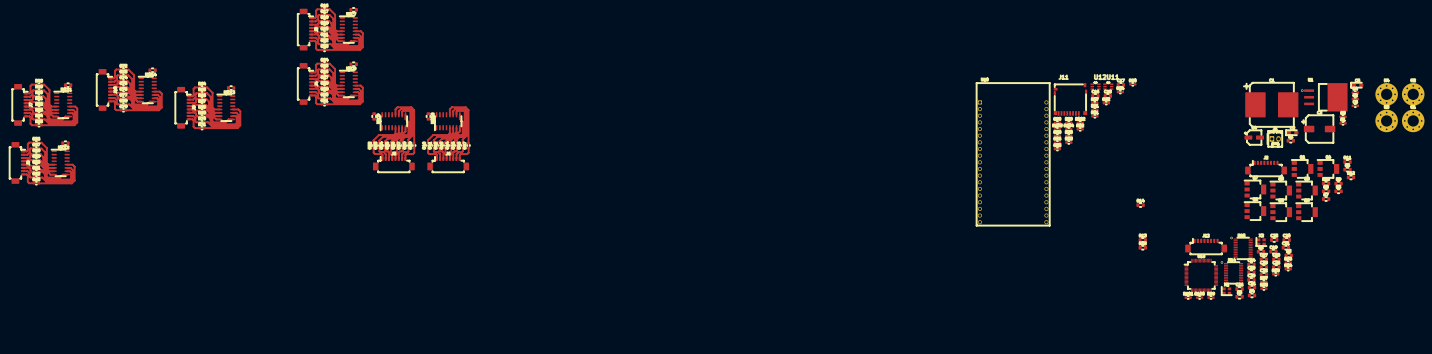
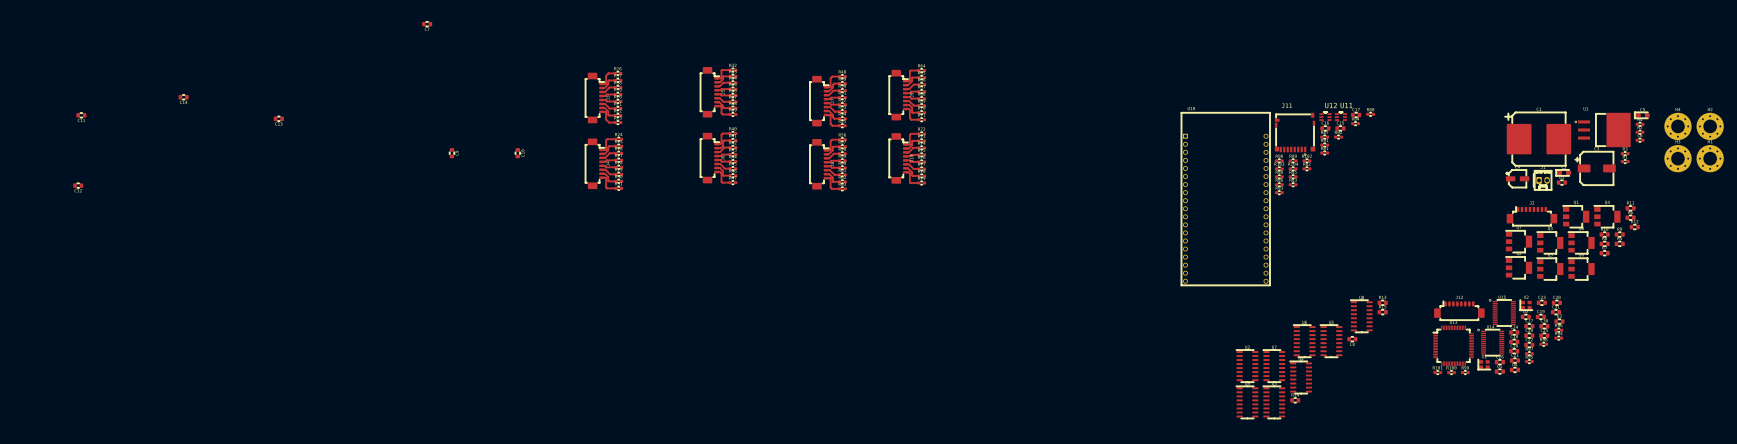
top track: (322, 9) (317, 9) (316, 17) (311, 18) -> none
part position: (324, 9) -> (617, 73)
top track: (326, 9) (329, 9) (335, 14) (335, 29) (342, 31) -> none
top track: (322, 15) (318, 15) (315, 21) (311, 21) -> none
part position: (324, 15) -> (617, 80)
top track: (326, 15) (333, 18) (333, 30) (337, 34) (342, 34) -> none
top track: (322, 20) (319, 20) (317, 24) (311, 24) -> none
part position: (324, 20) -> (617, 87)
top track: (326, 20) (331, 23) (331, 31) (337, 37) (342, 37) -> none
top track: (322, 26) (311, 27) -> none
part position: (324, 26) -> (617, 94)
top track: (326, 26) (338, 41) (342, 41) -> none
part position: (305, 29) -> (594, 97)
part position: (348, 29) -> (1247, 366)
top track: (311, 31) (322, 32) -> none
top track: (355, 31) (362, 33) (362, 47) (360, 49) (326, 49) -> none
part position: (324, 32) -> (617, 101)
top track: (326, 32) (334, 40) (335, 44) (348, 44) (351, 41) (355, 41) -> none
top track: (311, 34) (317, 34) (319, 38) (322, 38) -> none
top track: (355, 34) (361, 36) (359, 47) (334, 47) (330, 44) (326, 44) -> none
top track: (311, 37) (315, 37) (318, 44) (322, 44) -> none
top track: (355, 37) (359, 38) (358, 46) (335, 46) (330, 38) (326, 38) -> none
part position: (324, 38) -> (617, 108)
top track: (311, 41) (316, 42) (317, 49) (322, 49) -> none
part position: (324, 44) -> (617, 115)
top track: none -> (730, 70) (722, 70) (721, 77) (716, 78)
top track: none -> (918, 70) (910, 70) (909, 80) (905, 81)
part position: (324, 49) -> (617, 122)
top track: none -> (615, 73) (608, 73) (606, 75) (606, 83) (601, 84)
top track: none -> (730, 76) (723, 76) (719, 82) (716, 82)
top track: none -> (839, 76) (832, 76) (830, 86) (826, 87)
top track: none -> (918, 77) (912, 77) (912, 81) (905, 85)
top track: none -> (615, 80) (609, 80) (608, 84) (601, 88)
top track: none -> (730, 82) (723, 82) (716, 86)
top track: none -> (839, 83) (834, 83) (829, 91) (826, 91)
top track: none -> (918, 84) (913, 84) (909, 89) (905, 89)
top track: none -> (615, 87) (609, 87) (605, 92) (601, 92)
top track: (322, 63) (317, 63) (316, 71) (311, 72) -> none
part position: (324, 63) -> (618, 139)
top track: (326, 63) (329, 63) (335, 69) (335, 84) (342, 85) -> none
top track: none -> (730, 89) (716, 90)
part position: (353, 64) -> (1352, 339)
top track: none -> (839, 90) (833, 90) (826, 95)
top track: none -> (918, 91) (905, 93)
top track: none -> (615, 94) (601, 96)
top track: none -> (716, 94) (730, 95)
top track: (121, 69) (116, 69) (114, 77) (110, 78) -> none
part position: (123, 69) -> (921, 133)
top track: (125, 69) (128, 69) (133, 75) (133, 90) (141, 91) -> none
top track: (322, 69) (318, 69) (315, 75) (311, 75) -> none
part position: (324, 69) -> (618, 146)
top track: (326, 69) (333, 73) (333, 84) (337, 88) (342, 88) -> none
top track: none -> (839, 97) (826, 99)
top track: none -> (905, 97) (918, 98)
top track: none -> (716, 98) (723, 101) (730, 101)
top track: none -> (601, 99) (615, 101)
top track: none -> (905, 101) (909, 101) (913, 105) (918, 105)
top track: none -> (716, 102) (719, 102) (723, 108) (730, 108)
top track: (121, 75) (117, 75) (114, 81) (110, 81) -> none
part position: (123, 75) -> (921, 140)
top track: (125, 75) (132, 79) (132, 90) (136, 94) (141, 94) -> none
top track: (322, 75) (319, 75) (317, 79) (311, 79) -> none
part position: (324, 75) -> (618, 153)
top track: (326, 75) (331, 77) (331, 85) (337, 92) (342, 92) -> none
top track: none -> (601, 103) (605, 103) (609, 108) (615, 108)
top track: none -> (826, 103) (839, 104)
top track: none -> (905, 105) (912, 107) (912, 112) (918, 112)
top track: none -> (716, 106) (721, 106) (722, 114) (730, 114)
top track: none -> (826, 107) (830, 107) (834, 111) (839, 111)
top track: none -> (601, 107) (608, 111) (609, 115) (615, 115)
top track: none -> (905, 109) (909, 110) (911, 119) (918, 119)
top track: (121, 81) (118, 81) (116, 84) (110, 84) -> none
part position: (123, 81) -> (921, 147)
top track: (125, 81) (130, 83) (130, 91) (136, 98) (141, 98) -> none
top track: (322, 81) (311, 82) -> none
part position: (324, 81) -> (618, 160)
top track: (326, 81) (338, 95) (342, 95) -> none
top track: none -> (826, 111) (829, 111) (834, 118) (839, 118)
top track: none -> (601, 111) (606, 112) (606, 119) (609, 122) (615, 122)
part position: (305, 83) -> (594, 163)
part position: (348, 83) -> (1274, 402)
top track: (36, 84) (31, 84) (30, 92) (25, 93) -> none
part position: (39, 84) -> (842, 76)
top track: (41, 84) (44, 84) (49, 89) (49, 105) (56, 106) -> none
top track: none -> (826, 115) (830, 115) (832, 125) (839, 125)
top track: (311, 85) (322, 86) -> none
top track: (355, 85) (362, 87) (362, 101) (360, 104) (326, 104) -> none
top track: (121, 86) (110, 88) -> none
part position: (324, 86) -> (618, 167)
top track: (326, 86) (334, 94) (335, 98) (348, 98) (351, 95) (355, 95) -> none
part position: (123, 87) -> (921, 154)
top track: (125, 87) (137, 101) (141, 101) -> none
top track: (199, 87) (194, 87) (193, 95) (188, 96) -> none
part position: (202, 87) -> (921, 70)
top track: (204, 87) (207, 87) (212, 92) (212, 107) (219, 109) -> none
top track: (311, 88) (317, 88) (319, 92) (322, 92) -> none
top track: (355, 88) (360, 91) (359, 102) (334, 102) (330, 98) (326, 98) -> none
part position: (104, 89) -> (898, 158)
part position: (147, 89) -> (1247, 402)
top track: (36, 90) (33, 90) (30, 96) (25, 96) -> none
part position: (39, 90) -> (842, 83)
top track: (41, 90) (47, 94) (47, 105) (51, 109) (56, 109) -> none
top track: (110, 91) (121, 92) -> none
top track: (154, 91) (161, 93) (161, 107) (158, 110) (125, 110) -> none
part position: (123, 92) -> (921, 161)
top track: (125, 92) (133, 100) (134, 104) (147, 104) (149, 101) (154, 101) -> none
top track: (311, 92) (315, 92) (318, 98) (322, 98) -> none
part position: (324, 92) -> (618, 174)
top track: (355, 92) (359, 93) (358, 100) (335, 100) (330, 92) (326, 92) -> none
top track: (199, 93) (196, 93) (193, 99) (188, 99) -> none
part position: (202, 93) -> (921, 77)
top track: (204, 93) (210, 96) (210, 108) (214, 112) (219, 112) -> none
top track: (110, 94) (116, 94) (118, 98) (121, 98) -> none
top track: (154, 94) (159, 97) (158, 108) (133, 108) (129, 104) (125, 104) -> none
top track: (311, 95) (316, 96) (317, 104) (322, 104) -> none
top track: (36, 96) (33, 96) (32, 99) (25, 99) -> none
part position: (39, 96) -> (842, 90)
top track: (41, 96) (45, 98) (45, 106) (52, 113) (56, 113) -> none
top track: (110, 98) (114, 98) (117, 104) (121, 104) -> none
part position: (123, 98) -> (921, 168)
top track: (154, 98) (158, 99) (157, 106) (133, 106) (129, 98) (125, 98) -> none
part position: (324, 98) -> (618, 181)
top track: (199, 99) (197, 99) (195, 102) (188, 102) -> none
part position: (202, 99) -> (921, 84)
top track: (204, 99) (208, 101) (208, 109) (215, 116) (219, 116) -> none
top track: none -> (730, 133) (722, 133) (721, 143) (716, 144)
top track: none -> (918, 133) (910, 133) (909, 144) (905, 144)
top track: (110, 101) (114, 102) (116, 110) (121, 110) -> none
top track: (36, 102) (25, 103) -> none
part position: (39, 102) -> (842, 97)
top track: (41, 102) (53, 116) (56, 116) -> none
part position: (20, 104) -> (819, 101)
part position: (63, 104) -> (1304, 341)
part position: (123, 104) -> (921, 175)
top track: (199, 104) (188, 106) -> none
part position: (202, 104) -> (921, 91)
top track: (204, 104) (216, 119) (219, 119) -> none
part position: (324, 104) -> (618, 188)
top track: none -> (615, 139) (607, 139) (606, 149) (601, 149)
top track: none -> (730, 140) (723, 140) (722, 146) (716, 148)
top track: none -> (839, 139) (832, 139) (830, 149) (826, 150)
top track: (25, 106) (36, 107) -> none
top track: (69, 106) (77, 108) (77, 122) (74, 125) (41, 125) -> none
top track: none -> (918, 140) (912, 140) (912, 145) (905, 148)
part position: (39, 107) -> (842, 104)
top track: (41, 107) (49, 115) (50, 119) (62, 119) (65, 116) (69, 116) -> none
part position: (183, 107) -> (898, 95)
part position: (226, 107) -> (1361, 316)
top track: (25, 109) (32, 109) (33, 113) (36, 113) -> none
top track: (69, 109) (75, 111) (73, 123) (48, 123) (44, 119) (41, 119) -> none
top track: (188, 109) (199, 110) -> none
top track: (232, 109) (240, 111) (240, 125) (237, 128) (204, 128) -> none
part position: (123, 110) -> (921, 183)
part position: (202, 110) -> (921, 98)
top track: (204, 110) (212, 118) (213, 122) (225, 122) (228, 119) (232, 119) -> none
top track: none -> (615, 146) (609, 146) (608, 150) (601, 153)
top track: none -> (730, 147) (724, 147) (719, 152) (716, 152)
top track: none -> (839, 146) (833, 146) (832, 150) (826, 154)
top track: (188, 112) (195, 112) (197, 116) (199, 116) -> none
top track: (232, 112) (238, 114) (236, 126) (211, 126) (207, 122) (204, 122) -> none
top track: none -> (918, 147) (913, 147) (908, 152) (905, 152)
top track: (25, 113) (30, 113) (33, 119) (36, 119) -> none
part position: (39, 113) -> (842, 111)
top track: (69, 113) (73, 114) (73, 121) (49, 121) (44, 113) (41, 113) -> none
top track: (395, 114) (397, 107) (411, 107) (414, 110) (414, 143) -> none
top track: (398, 114) (400, 109) (412, 110) (412, 135) (408, 139) (408, 143) -> none
top track: (402, 114) (403, 110) (410, 111) (410, 135) (402, 139) (402, 143) -> none
top track: (405, 114) (405, 119) (408, 121) (408, 134) (404, 135) (396, 143) -> none
top track: (449, 114) (451, 107) (465, 107) (468, 110) (468, 143) -> none
top track: (453, 114) (455, 109) (466, 110) (466, 135) (462, 139) (462, 143) -> none
top track: (456, 114) (457, 110) (464, 111) (464, 135) (456, 139) (456, 143) -> none
top track: (459, 114) (459, 119) (462, 121) (462, 134) (458, 135) (451, 143) -> none
top track: (188, 115) (193, 115) (196, 122) (199, 122) -> none
top track: (25, 116) (30, 117) (31, 125) (36, 125) -> none
part position: (202, 116) -> (921, 105)
top track: (232, 116) (236, 116) (236, 124) (212, 124) (208, 116) (204, 116) -> none
top track: none -> (615, 153) (609, 153) (605, 157) (601, 157)
top track: none -> (839, 153) (833, 153) (829, 158) (826, 158)
top track: none -> (730, 154) (716, 156)
top track: none -> (918, 154) (905, 156)
part position: (39, 119) -> (842, 118)
top track: (188, 119) (193, 120) (194, 128) (199, 128) -> none
part rotation: 0° (393, 121) -> 90° clockwise (1301, 377)
part position: (393, 121) -> (1301, 377)
part rotation: 0° (448, 121) -> 90° clockwise (1331, 341)
part position: (448, 121) -> (1331, 341)
part position: (202, 122) -> (921, 112)
top track: none -> (615, 160) (601, 161)
top track: none -> (716, 160) (730, 161)
top track: none -> (839, 160) (826, 162)
top track: none -> (905, 160) (918, 161)
part position: (39, 125) -> (842, 125)
top track: none -> (716, 164) (720, 164) (724, 168) (730, 168)
top track: none -> (905, 164) (909, 164) (913, 168) (918, 168)
top track: none -> (601, 165) (615, 167)
top track: (395, 127) (393, 135) (378, 135) (373, 140) (373, 143) -> none
top track: (398, 127) (398, 132) (394, 136) (382, 136) (379, 143) -> none
top track: (402, 127) (402, 132) (395, 138) (387, 138) (385, 143) -> none
top track: (405, 127) (405, 131) (390, 143) -> none
top track: (449, 127) (448, 135) (433, 135) (427, 140) (427, 143) -> none
top track: (453, 127) (453, 132) (449, 136) (437, 136) (433, 143) -> none
top track: (456, 127) (456, 132) (449, 138) (442, 138) (439, 143) -> none
top track: (459, 127) (459, 131) (445, 143) -> none
top track: none -> (826, 166) (839, 167)
part position: (202, 128) -> (921, 119)
top track: none -> (716, 168) (722, 171) (723, 175) (730, 175)
top track: none -> (905, 168) (912, 172) (913, 175) (918, 175)
top track: none -> (601, 169) (605, 169) (610, 174) (615, 174)
top track: none -> (826, 170) (829, 170) (834, 174) (839, 174)
top track: none -> (716, 171) (721, 173) (722, 182) (730, 182)
top track: none -> (905, 172) (909, 173) (910, 183) (918, 183)
top track: none -> (601, 173) (608, 177) (608, 181) (615, 181)
top track: none -> (826, 174) (832, 177) (833, 181) (839, 181)
top track: none -> (601, 177) (606, 177) (606, 188) (615, 188)
top track: none -> (826, 178) (830, 178) (832, 188) (839, 188)
top track: (34, 142) (29, 142) (27, 150) (22, 151) -> none
part position: (36, 142) -> (842, 139)
top track: (38, 142) (41, 142) (46, 148) (46, 163) (54, 164) -> none
part rotation: 0° (373, 145) -> 90° clockwise (732, 70)
part position: (373, 145) -> (732, 70)
part rotation: 0° (379, 145) -> 90° clockwise (732, 76)
part position: (379, 145) -> (732, 76)
part rotation: 0° (385, 145) -> 90° clockwise (732, 82)
part position: (385, 145) -> (732, 82)
part rotation: 0° (390, 145) -> 90° clockwise (732, 89)
part position: (390, 145) -> (732, 89)
part rotation: 0° (396, 145) -> 90° clockwise (732, 95)
part position: (396, 145) -> (732, 95)
part rotation: 0° (402, 145) -> 90° clockwise (732, 101)
part position: (402, 145) -> (732, 101)
part rotation: 0° (408, 145) -> 90° clockwise (732, 108)
part position: (408, 145) -> (732, 108)
part rotation: 0° (414, 145) -> 90° clockwise (732, 114)
part position: (414, 145) -> (732, 114)
part rotation: 0° (427, 145) -> 90° clockwise (732, 133)
part position: (427, 145) -> (732, 133)
part rotation: 0° (433, 145) -> 90° clockwise (732, 140)
part position: (433, 145) -> (732, 140)
part rotation: 0° (439, 145) -> 90° clockwise (732, 147)
part position: (439, 145) -> (732, 147)
part rotation: 0° (445, 145) -> 90° clockwise (732, 154)
part position: (445, 145) -> (732, 154)
part rotation: 0° (451, 145) -> 90° clockwise (732, 161)
part position: (451, 145) -> (732, 161)
part rotation: 0° (456, 145) -> 90° clockwise (732, 168)
part position: (456, 145) -> (732, 168)
part rotation: 0° (462, 145) -> 90° clockwise (732, 175)
part position: (462, 145) -> (732, 175)
part rotation: 0° (468, 145) -> 90° clockwise (732, 182)
part position: (468, 145) -> (732, 182)
top track: (373, 147) (373, 152) (381, 154) (382, 158) -> none
top track: (379, 147) (379, 151) (385, 154) (385, 158) -> none
top track: (385, 147) (385, 150) (389, 152) (389, 158) -> none
top track: (391, 147) (392, 158) -> none
top track: (396, 147) (395, 158) -> none
top track: (402, 147) (402, 150) (398, 152) (398, 158) -> none
top track: (408, 147) (408, 151) (402, 154) (402, 158) -> none
top track: (414, 147) (414, 152) (406, 154) (405, 158) -> none
top track: (428, 147) (428, 152) (435, 154) (436, 158) -> none
top track: (433, 147) (433, 151) (440, 154) (440, 158) -> none
top track: (439, 147) (439, 150) (443, 152) (443, 158) -> none
top track: (445, 147) (446, 158) -> none
top track: (451, 147) (449, 158) -> none
top track: (457, 147) (457, 150) (453, 152) (453, 158) -> none
top track: (462, 147) (462, 151) (456, 154) (456, 158) -> none
top track: (468, 147) (468, 152) (460, 154) (459, 158) -> none
top track: (34, 148) (30, 148) (27, 154) (22, 154) -> none
part position: (36, 148) -> (842, 146)
top track: (38, 148) (45, 152) (45, 163) (49, 168) (54, 168) -> none
top track: (34, 154) (31, 154) (29, 158) (22, 158) -> none
part position: (36, 154) -> (842, 153)
top track: (38, 154) (43, 156) (43, 164) (49, 171) (54, 171) -> none
top track: (34, 160) (22, 161) -> none
part position: (36, 160) -> (842, 160)
top track: (38, 160) (50, 174) (54, 174) -> none
part position: (17, 162) -> (819, 164)
part position: (60, 162) -> (1274, 366)
top track: (22, 164) (34, 165) -> none
top track: (67, 164) (74, 166) (74, 180) (71, 183) (38, 183) -> none
part rotation: 0° (393, 164) -> 90° clockwise (709, 92)
part position: (393, 164) -> (709, 92)
part rotation: 0° (448, 164) -> 90° clockwise (709, 158)
part position: (448, 164) -> (709, 158)
part position: (36, 165) -> (842, 167)
top track: (38, 165) (46, 173) (47, 177) (59, 177) (62, 174) (67, 174) -> none
top track: (22, 167) (29, 167) (31, 171) (34, 171) -> none
top track: (67, 168) (72, 170) (71, 181) (46, 181) (42, 177) (38, 177) -> none
top track: (22, 171) (27, 171) (30, 177) (34, 177) -> none
part position: (36, 171) -> (842, 174)
top track: (67, 171) (70, 172) (70, 179) (46, 179) (42, 171) (38, 171) -> none
top track: (22, 174) (27, 175) (29, 183) (34, 183) -> none
part position: (36, 177) -> (842, 181)
part position: (36, 183) -> (842, 188)
part position: (1140, 205) -> (1295, 400)

